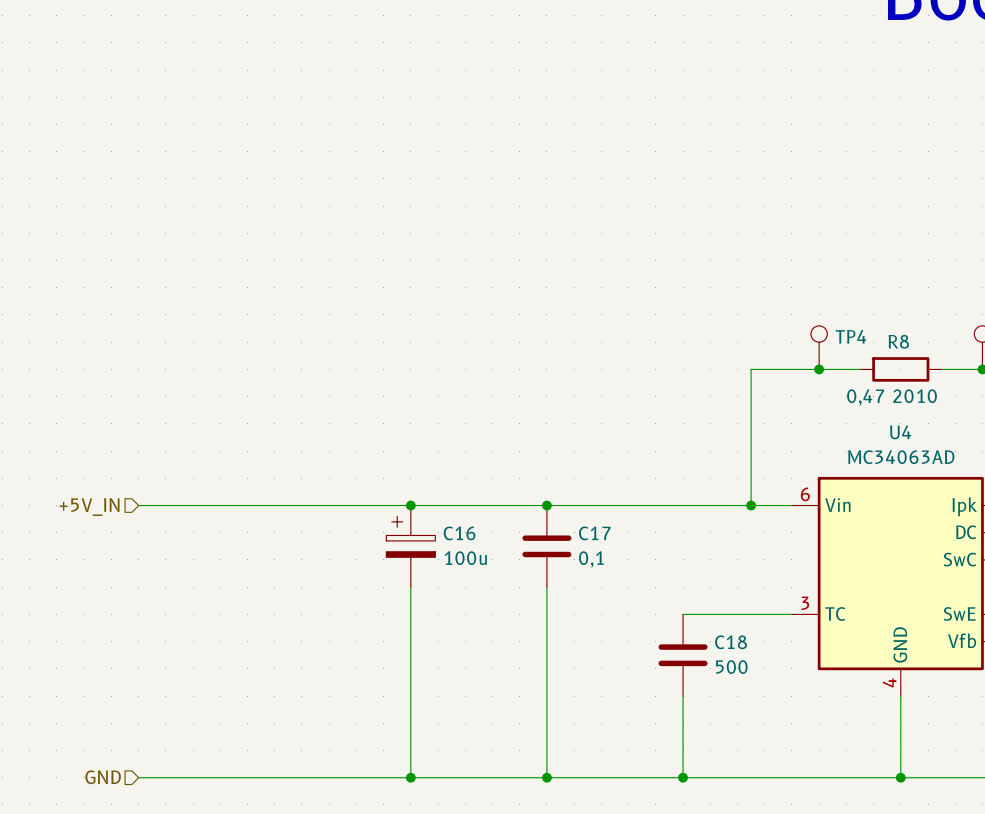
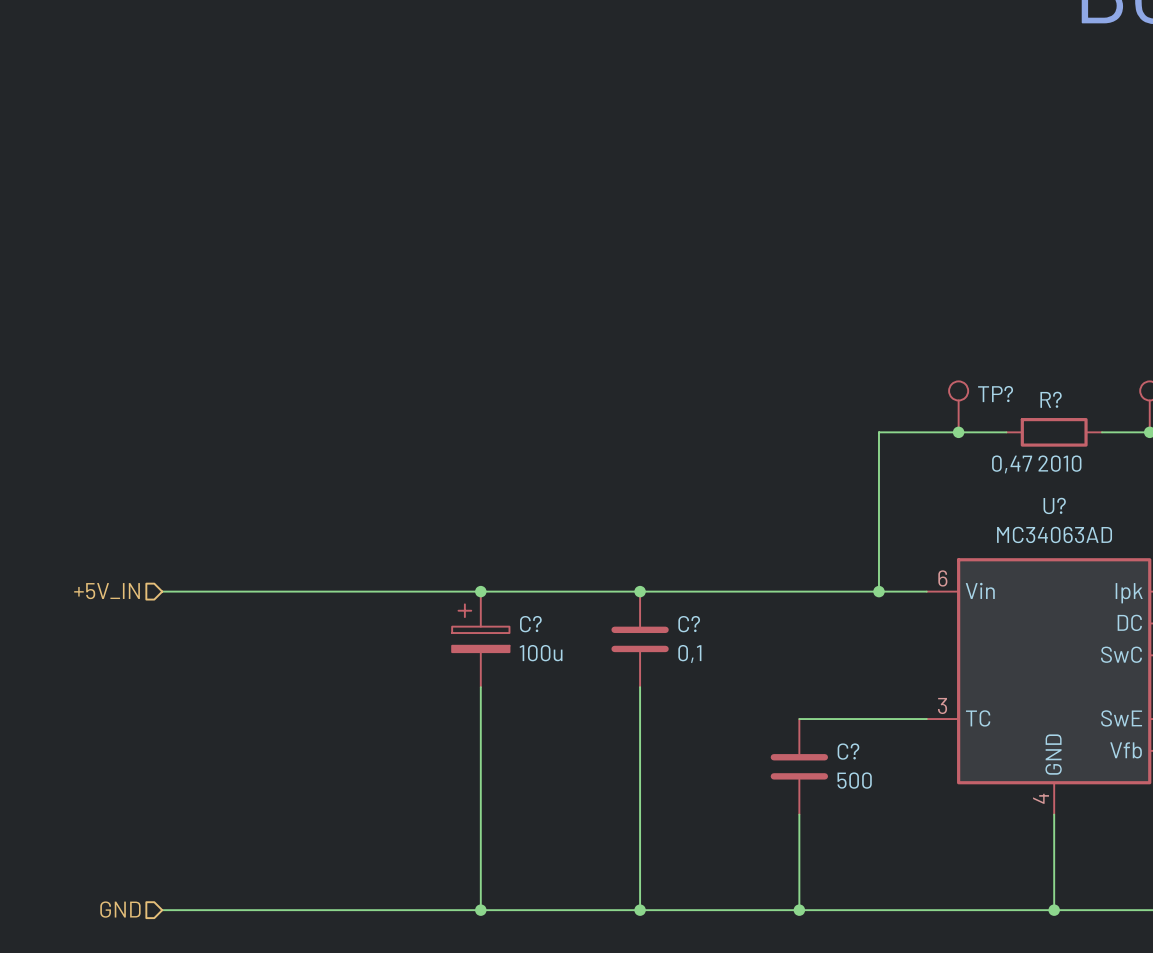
TP4 name: TP4 (850, 336) -> TP? (995, 394)
R8 name: R8 (898, 341) -> R? (1051, 399)
U4 name: U4 (900, 432) -> U? (1054, 505)
C16 name: C16 (459, 533) -> C? (530, 624)
C17 name: C17 (594, 533) -> C? (689, 624)
C18 name: C18 (731, 642) -> C? (848, 751)

